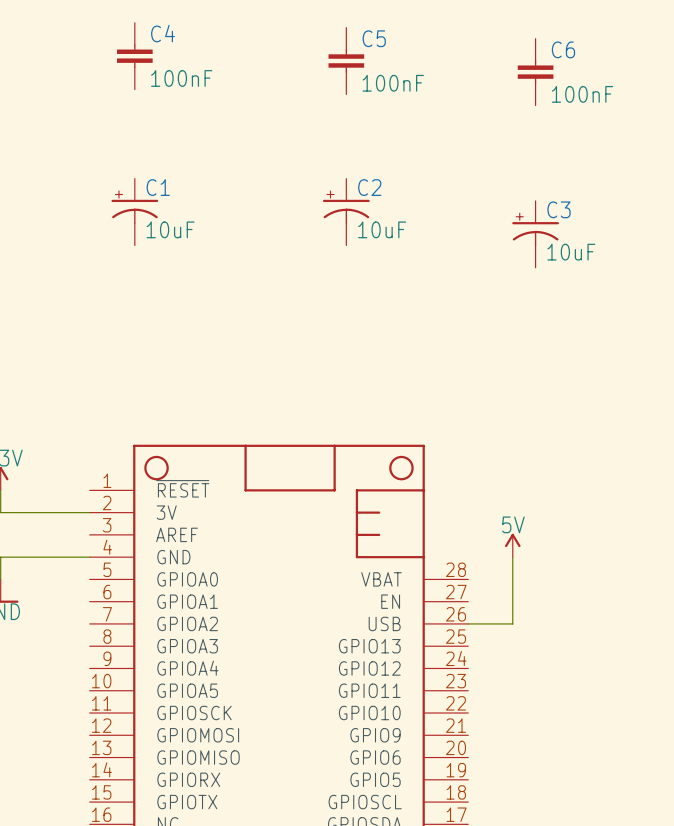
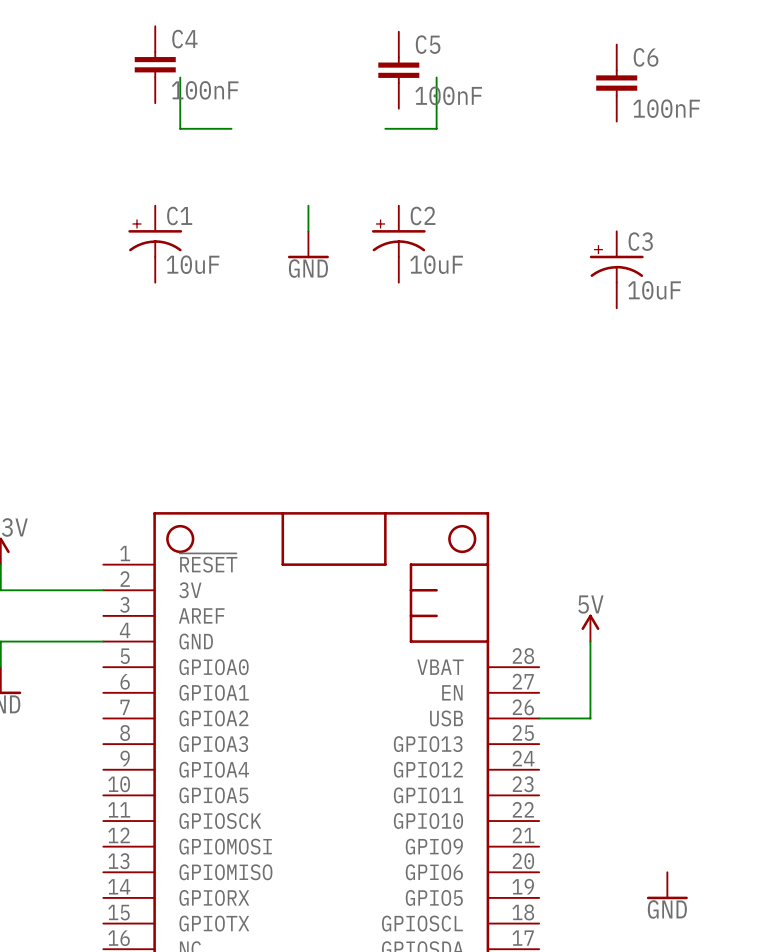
wire: none -> (180, 77) (180, 128) (231, 128)
wire: none -> (436, 77) (436, 128) (385, 128)
wire: none -> (308, 205) (308, 231)
power symbol: none -> GND (308, 244)
power symbol: none -> GND (667, 885)

